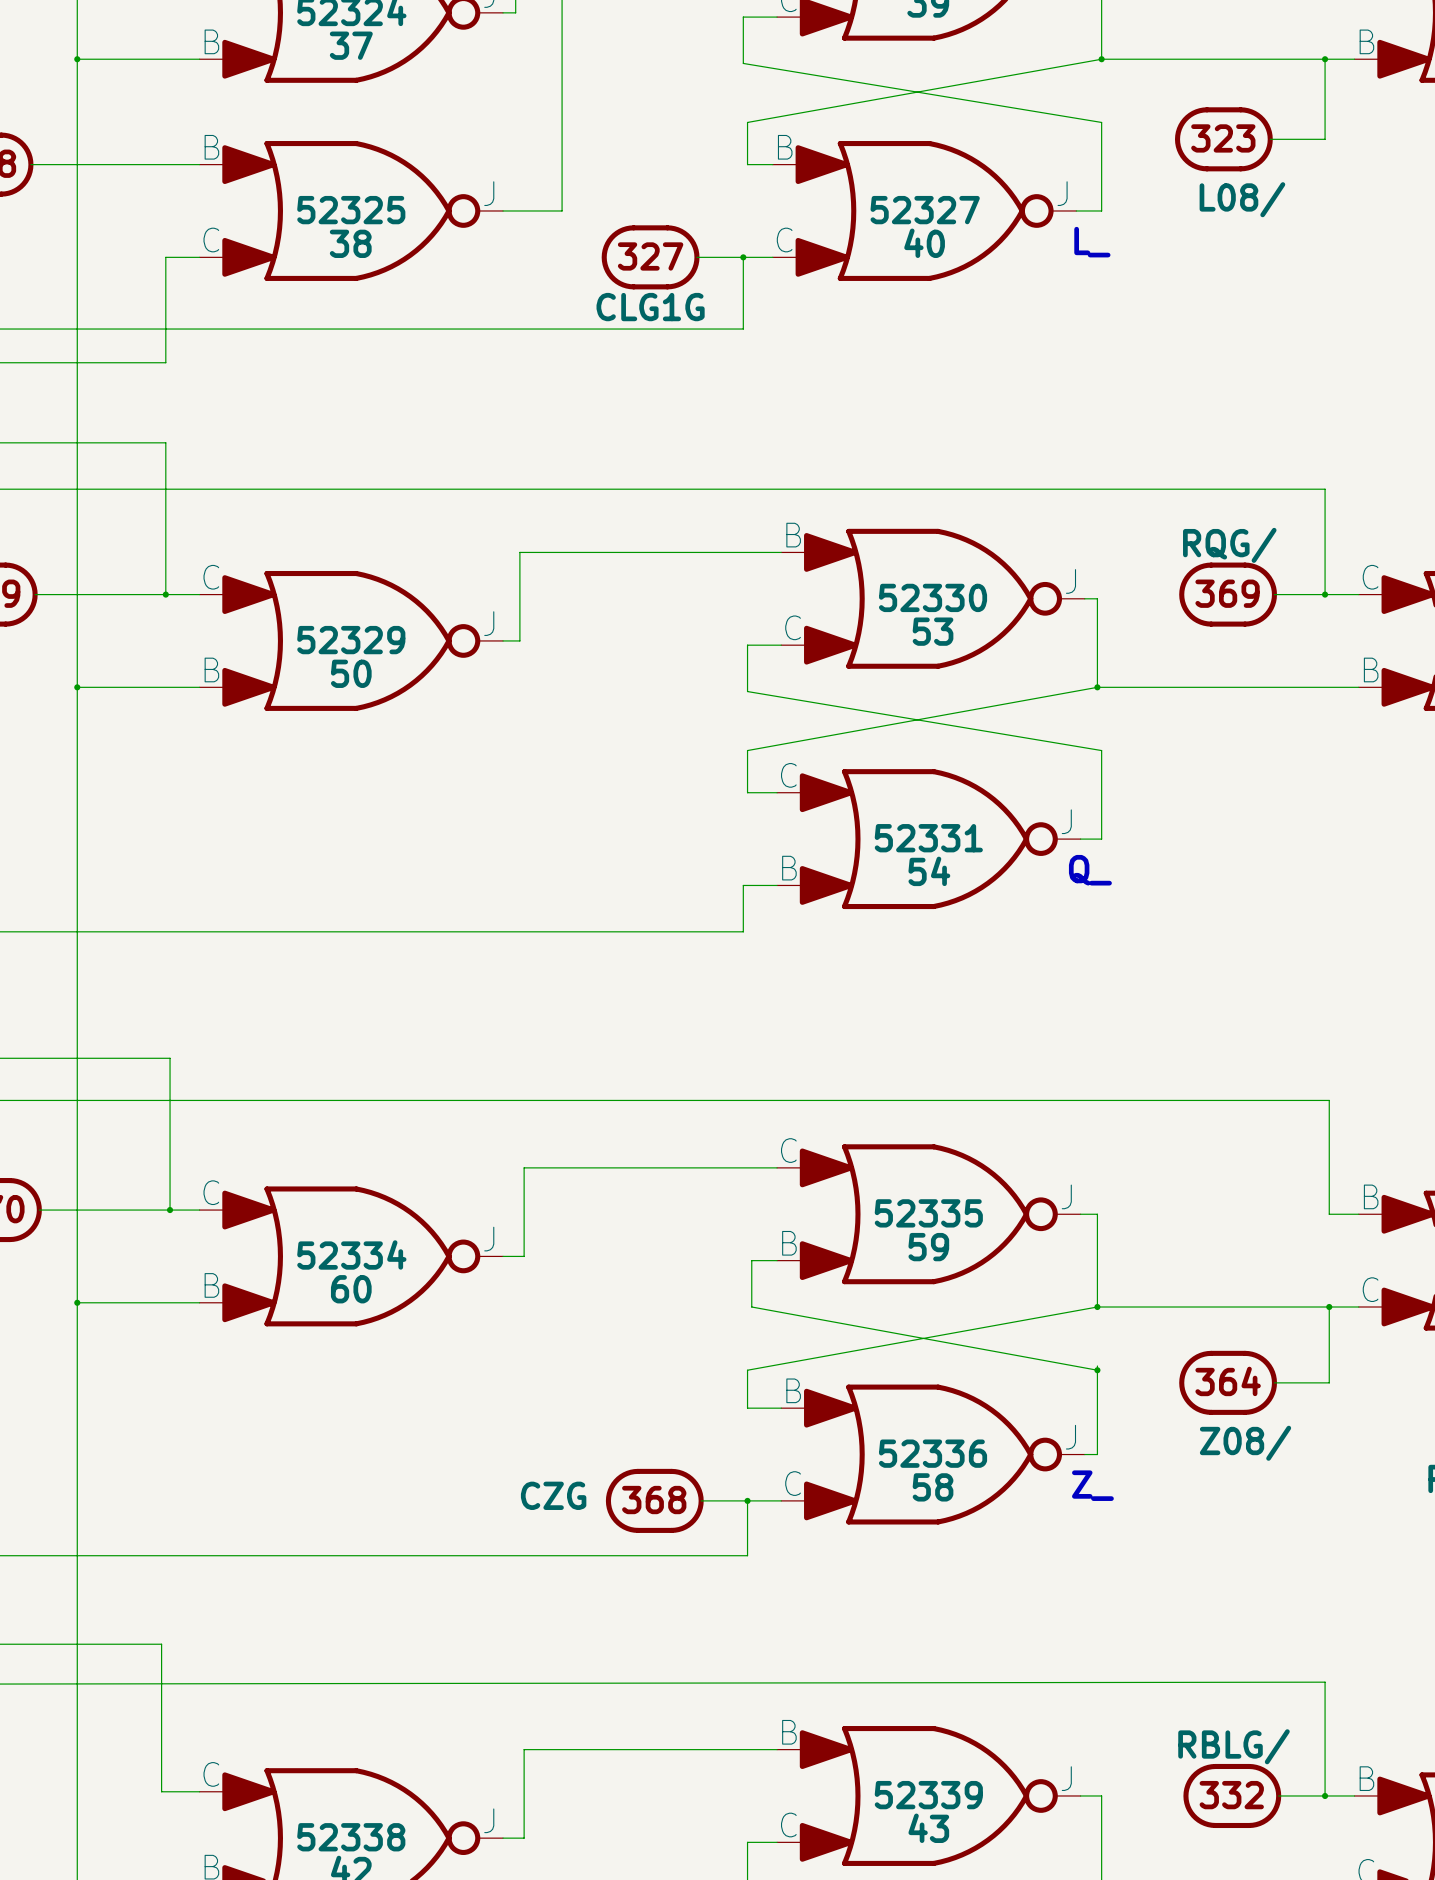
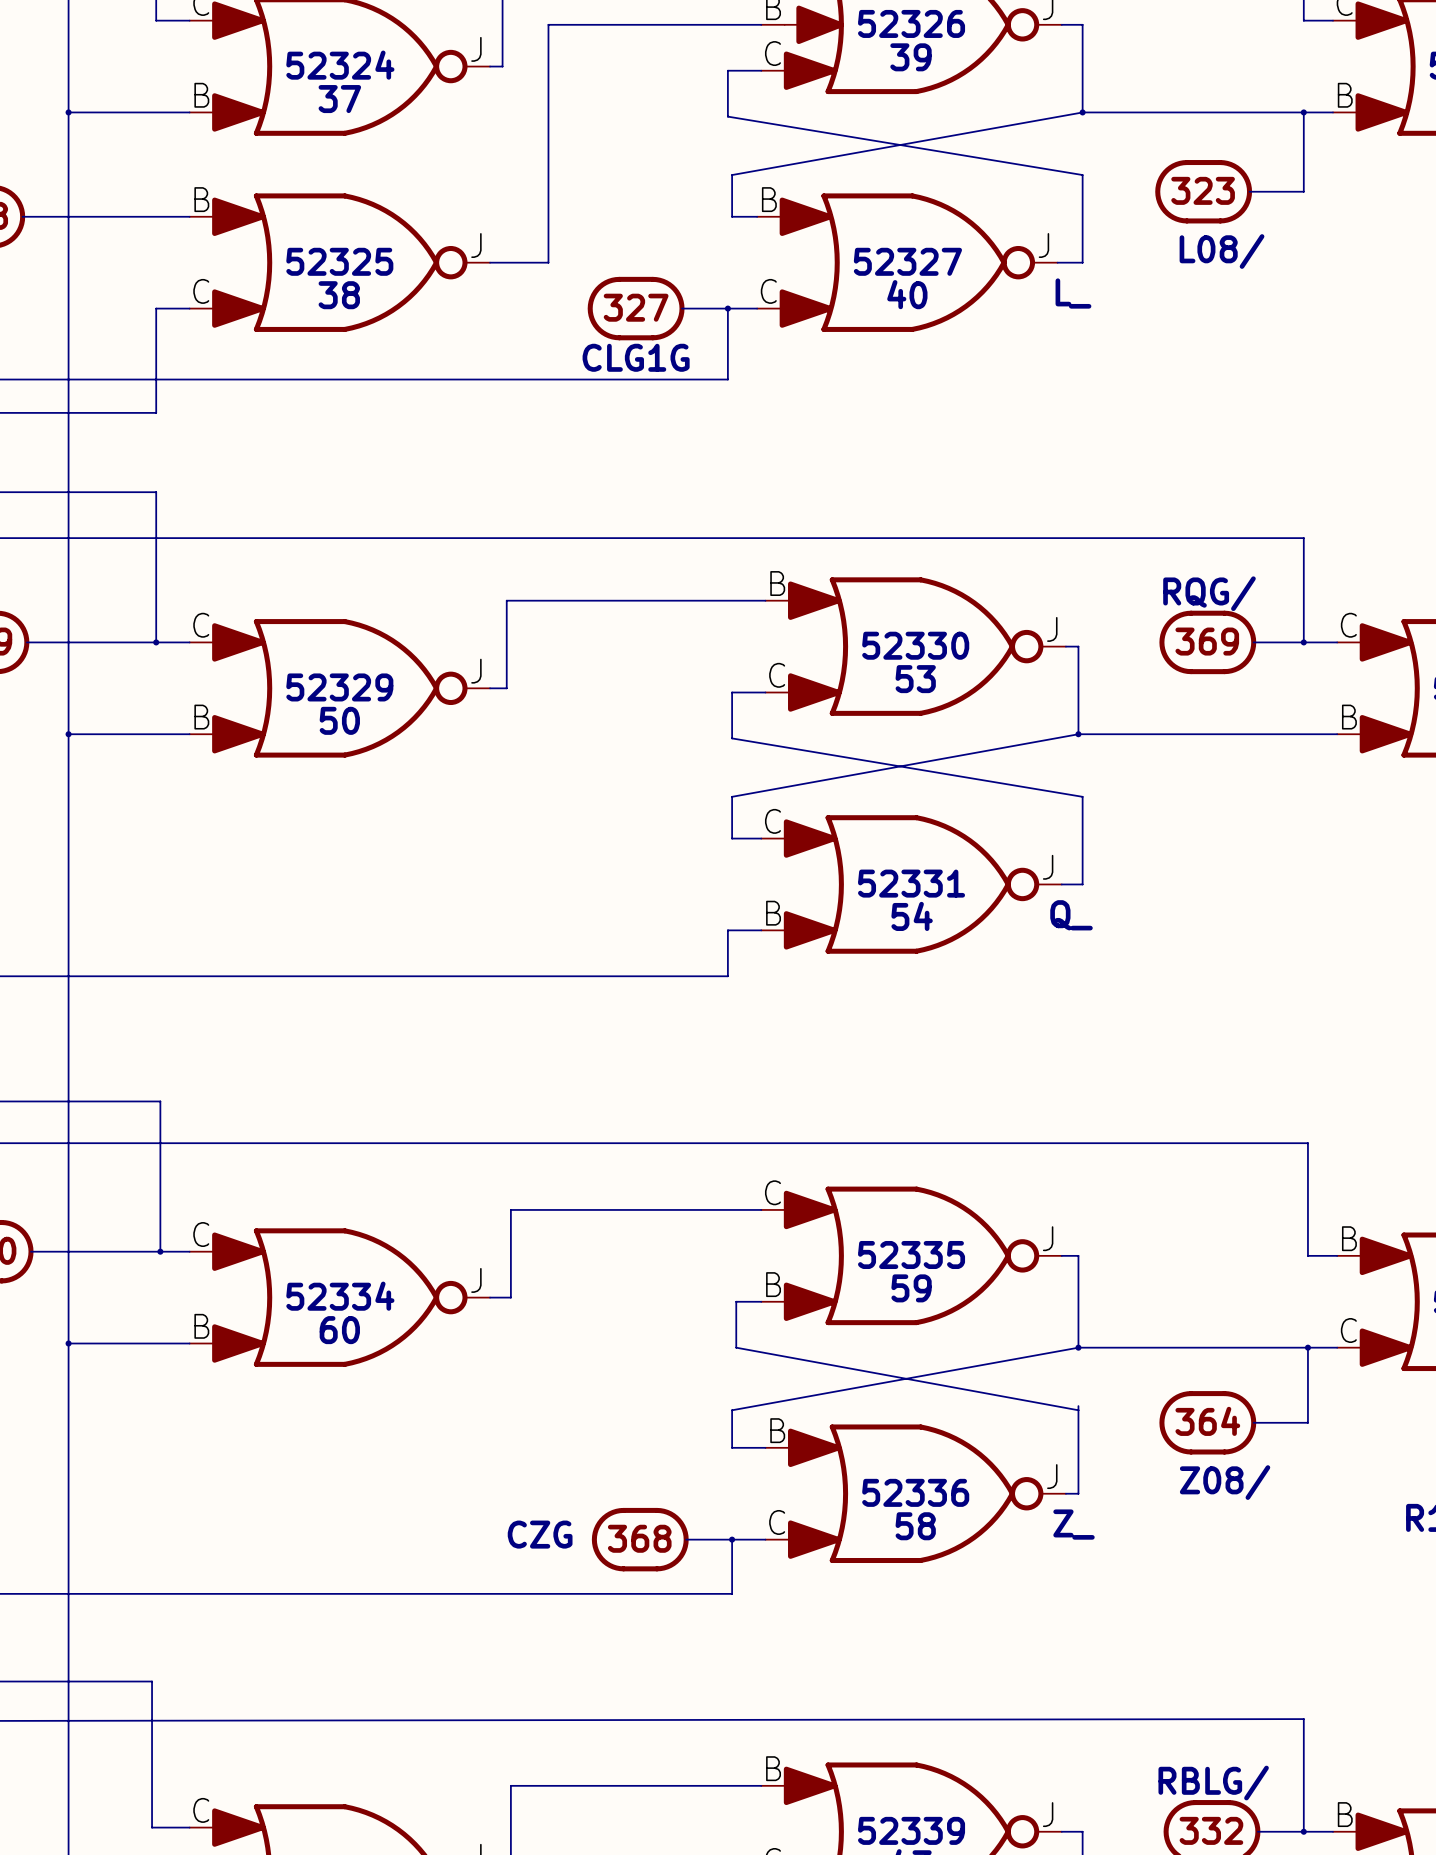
junction: (1097, 1370) -> none

